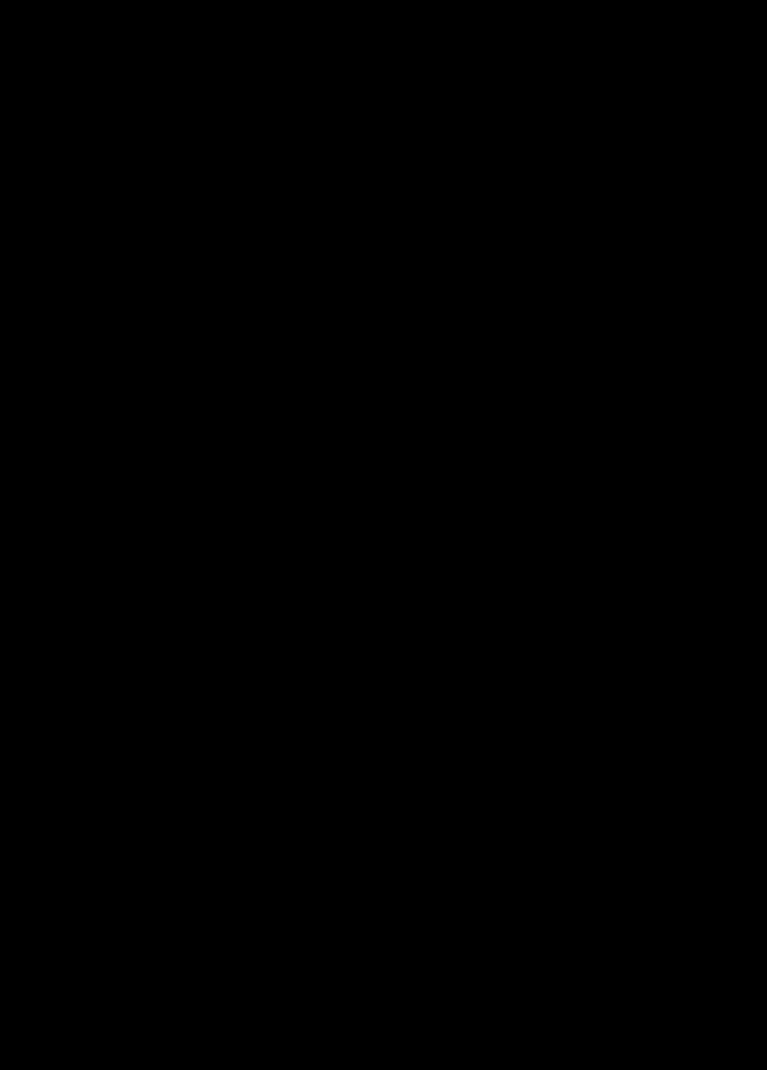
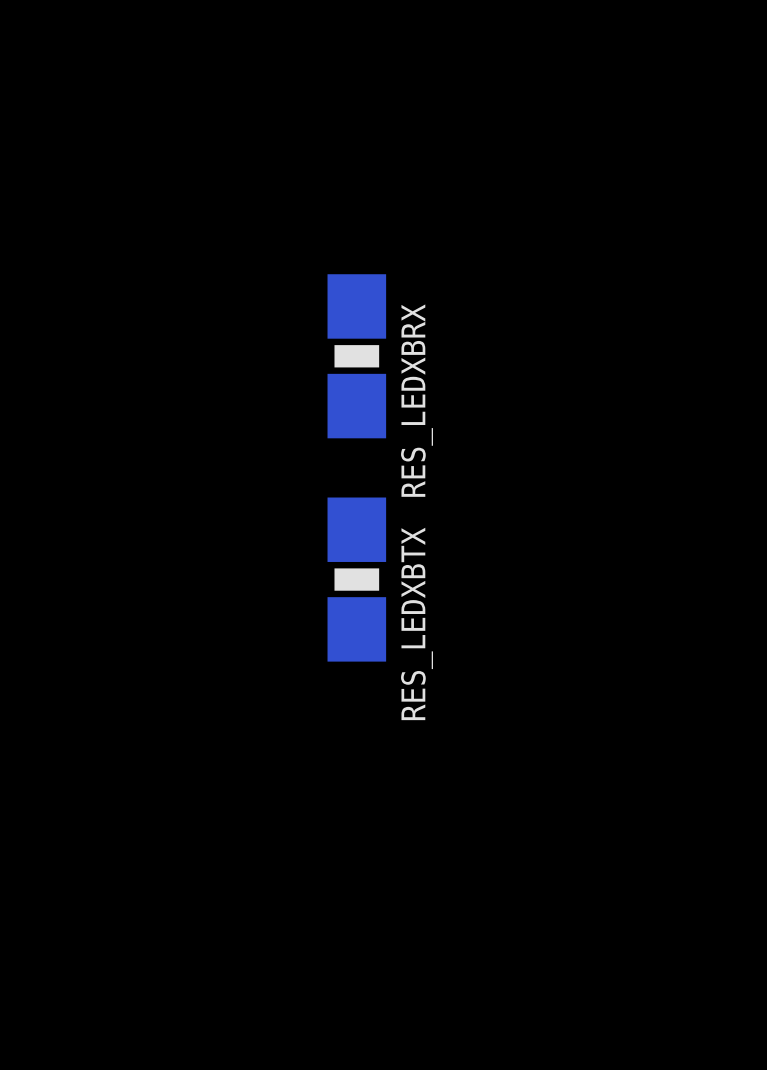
RES_LEDXBRX: none -> (356, 356)
RES_LEDXBTX: none -> (356, 579)

